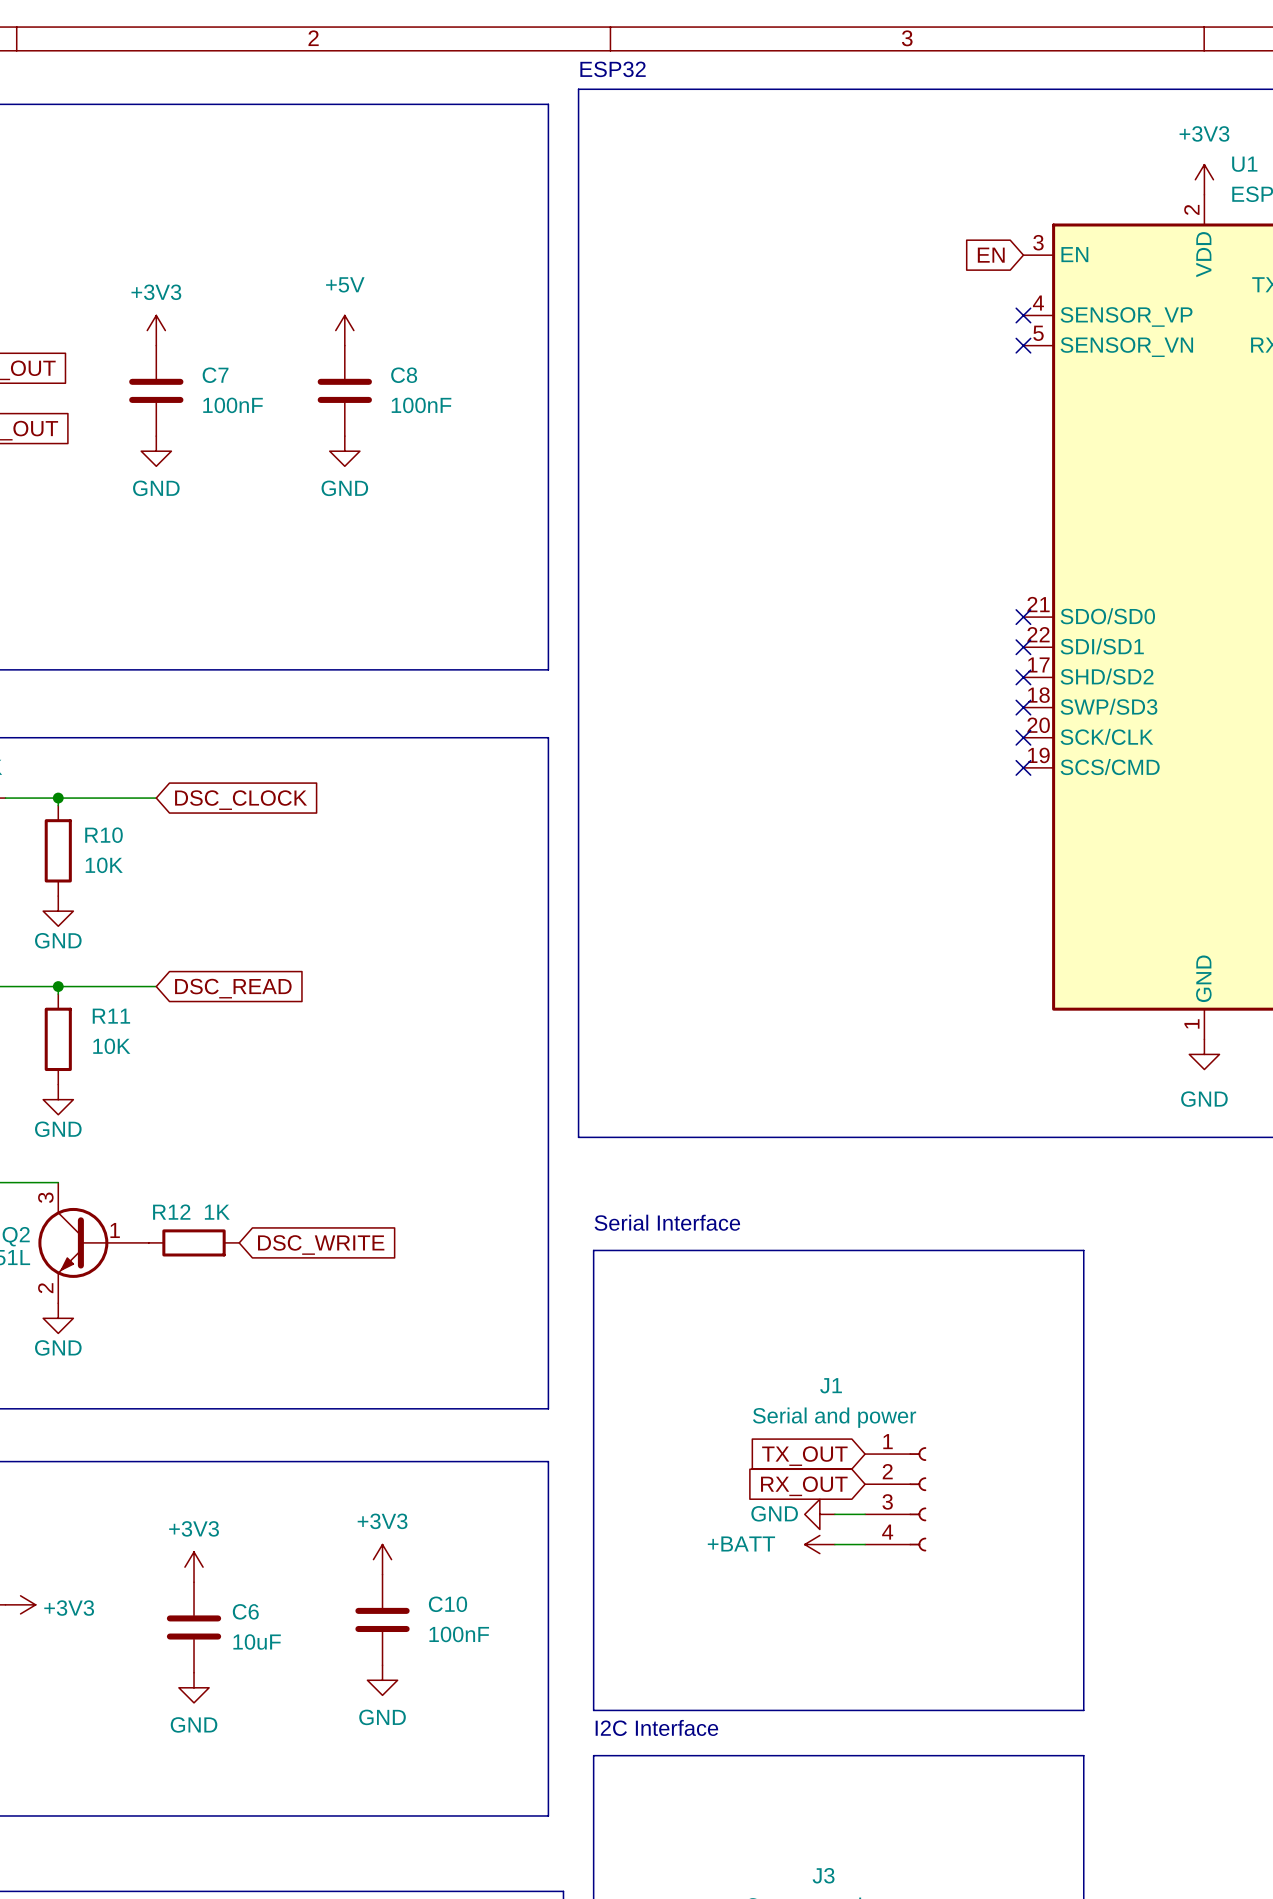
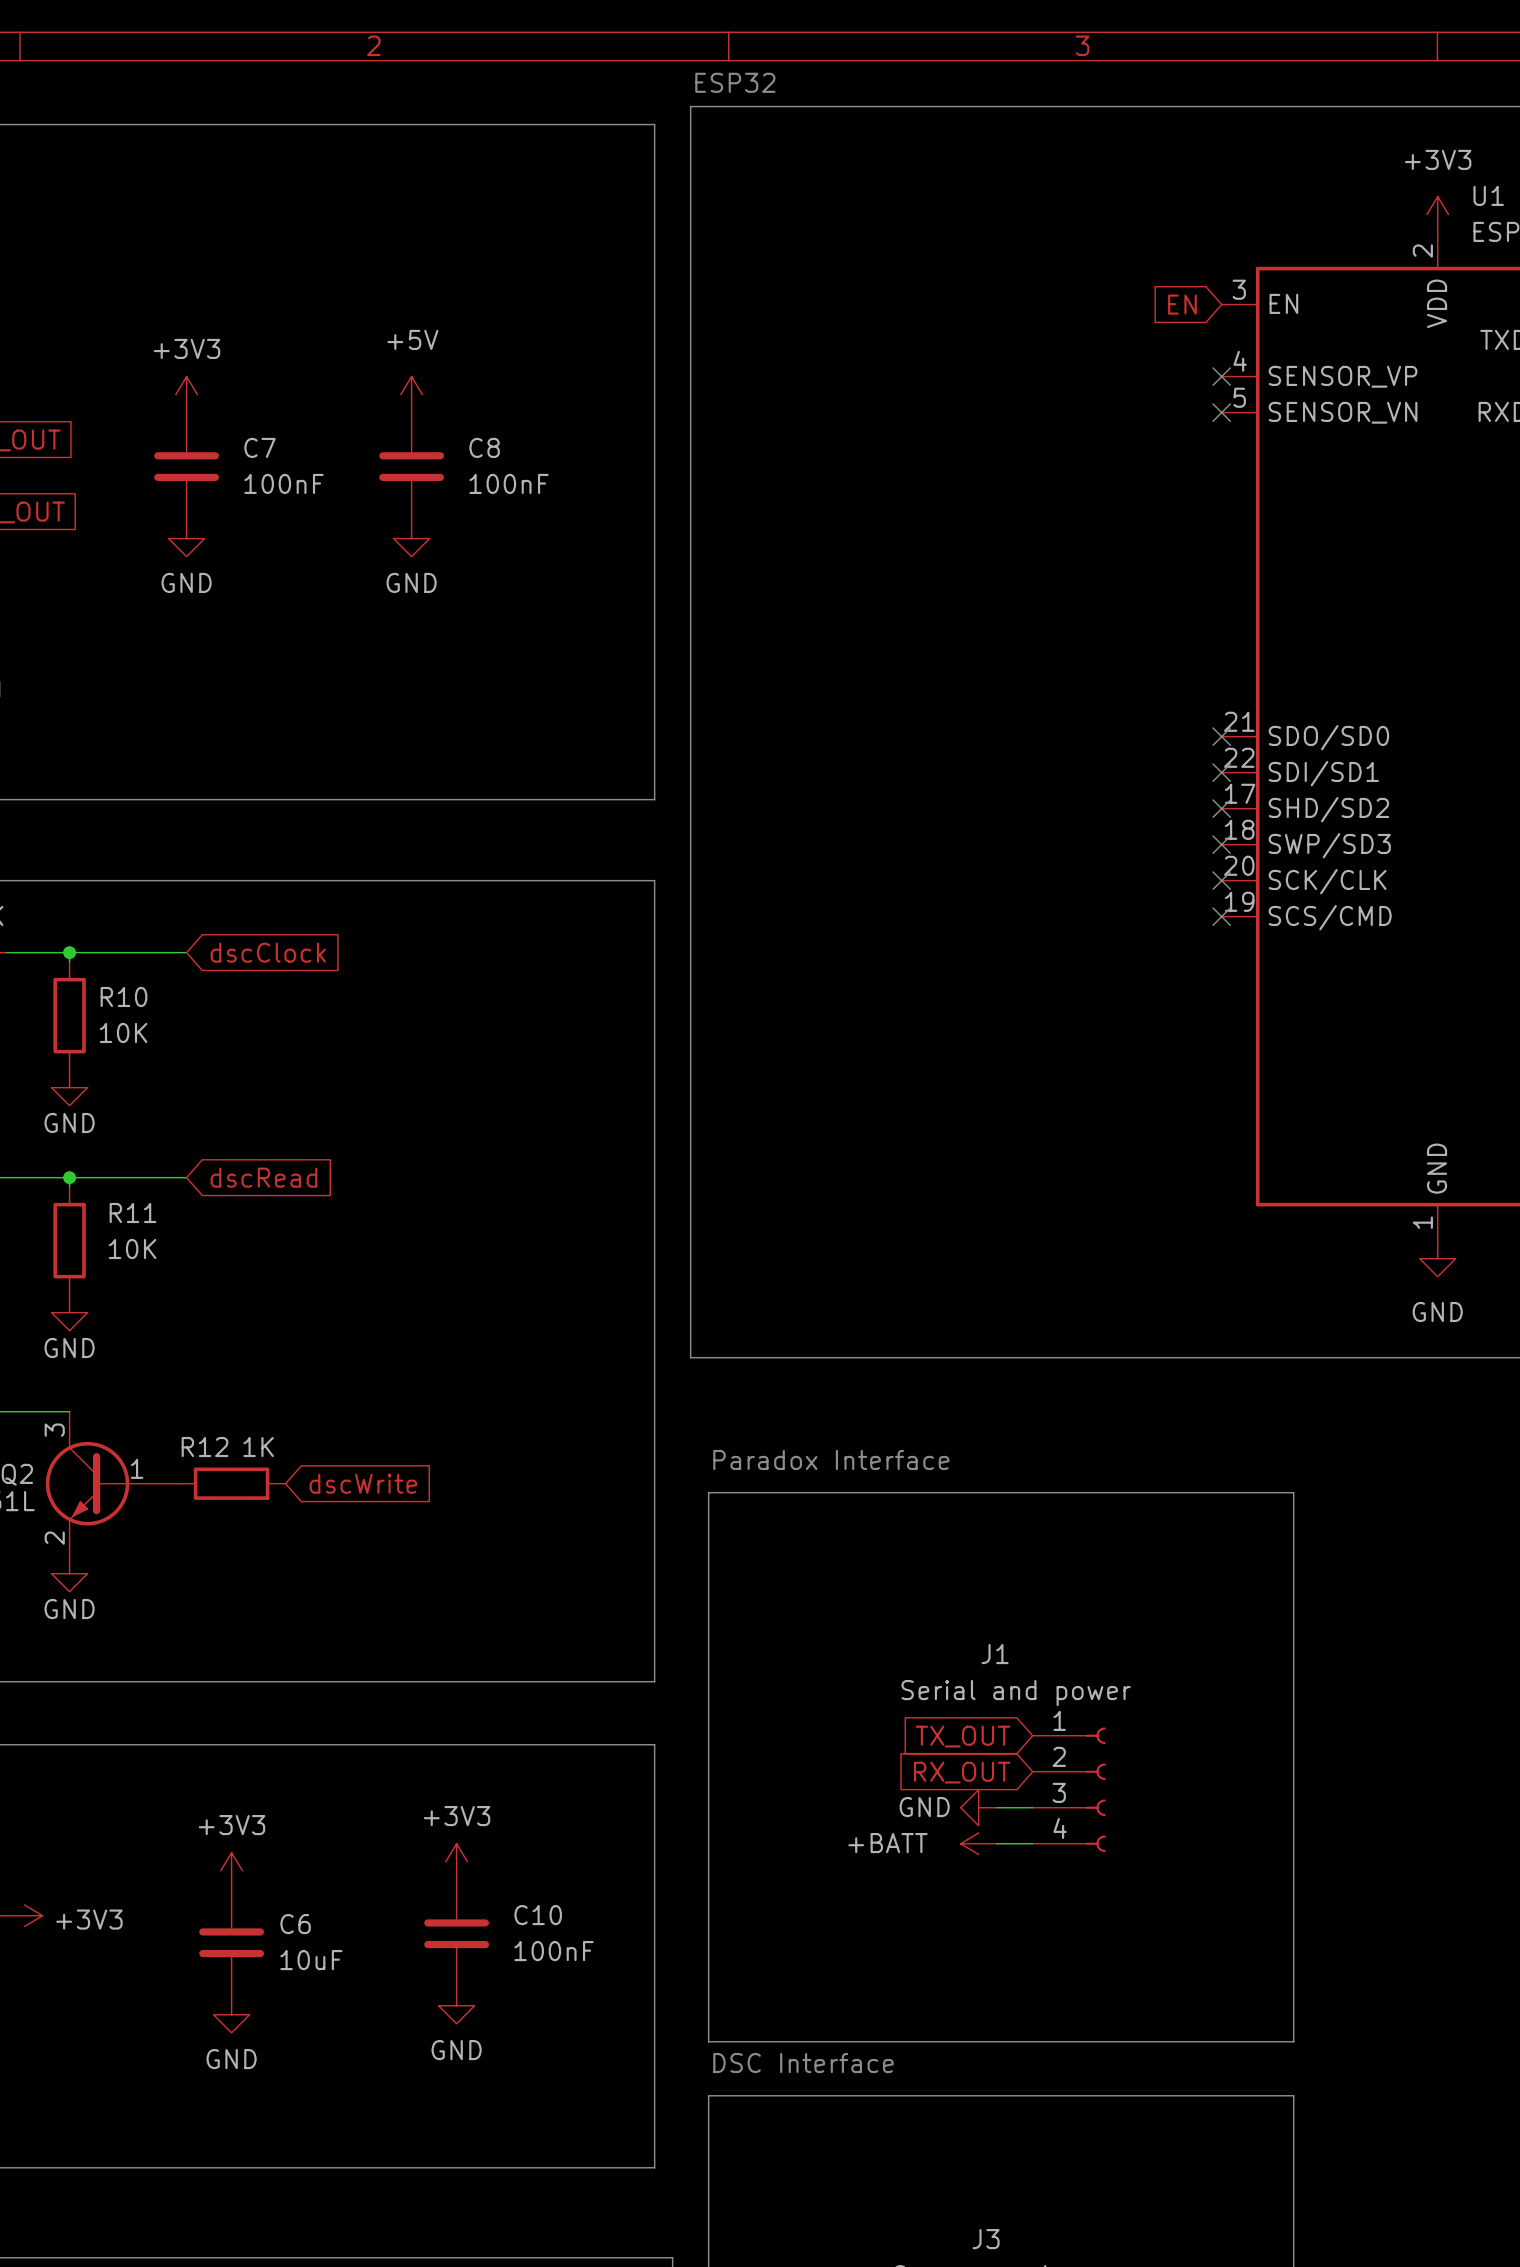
global label: DSC_CLOCK (241, 800) -> dscClock (268, 952)
global label: DSC_READ (233, 988) -> dscRead (263, 1177)
text: Serial Interface (667, 1222) -> Paradox Interface (831, 1459)
global label: DSC_WRITE (321, 1244) -> dscWrite (363, 1483)
text: I2C Interface (656, 1727) -> DSC Interface (803, 2063)

